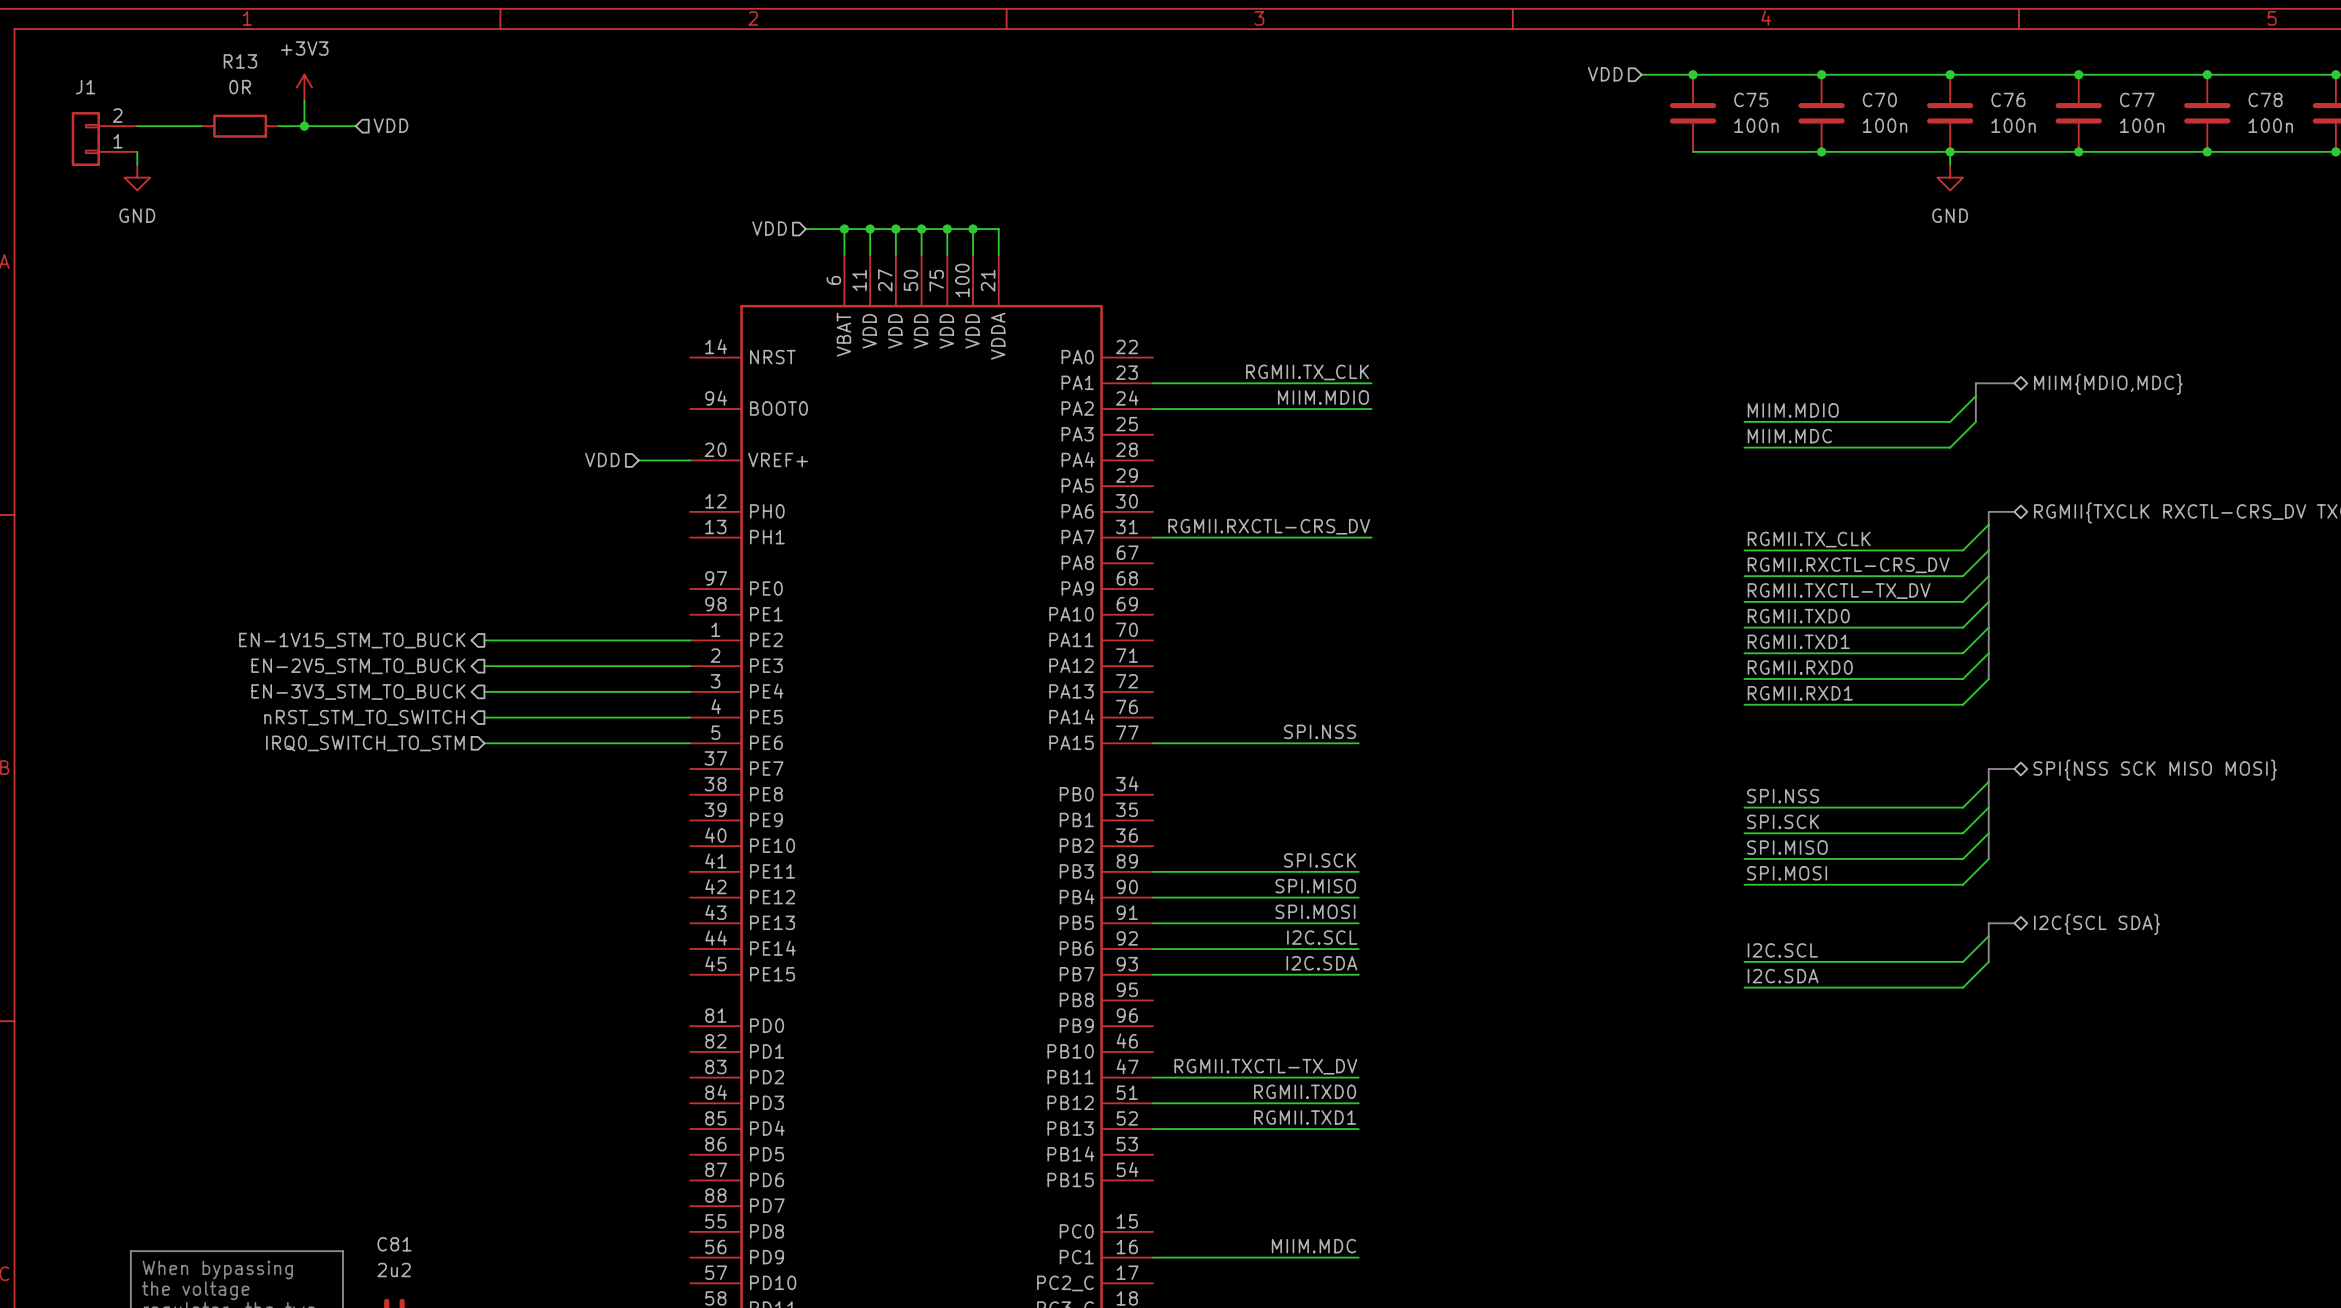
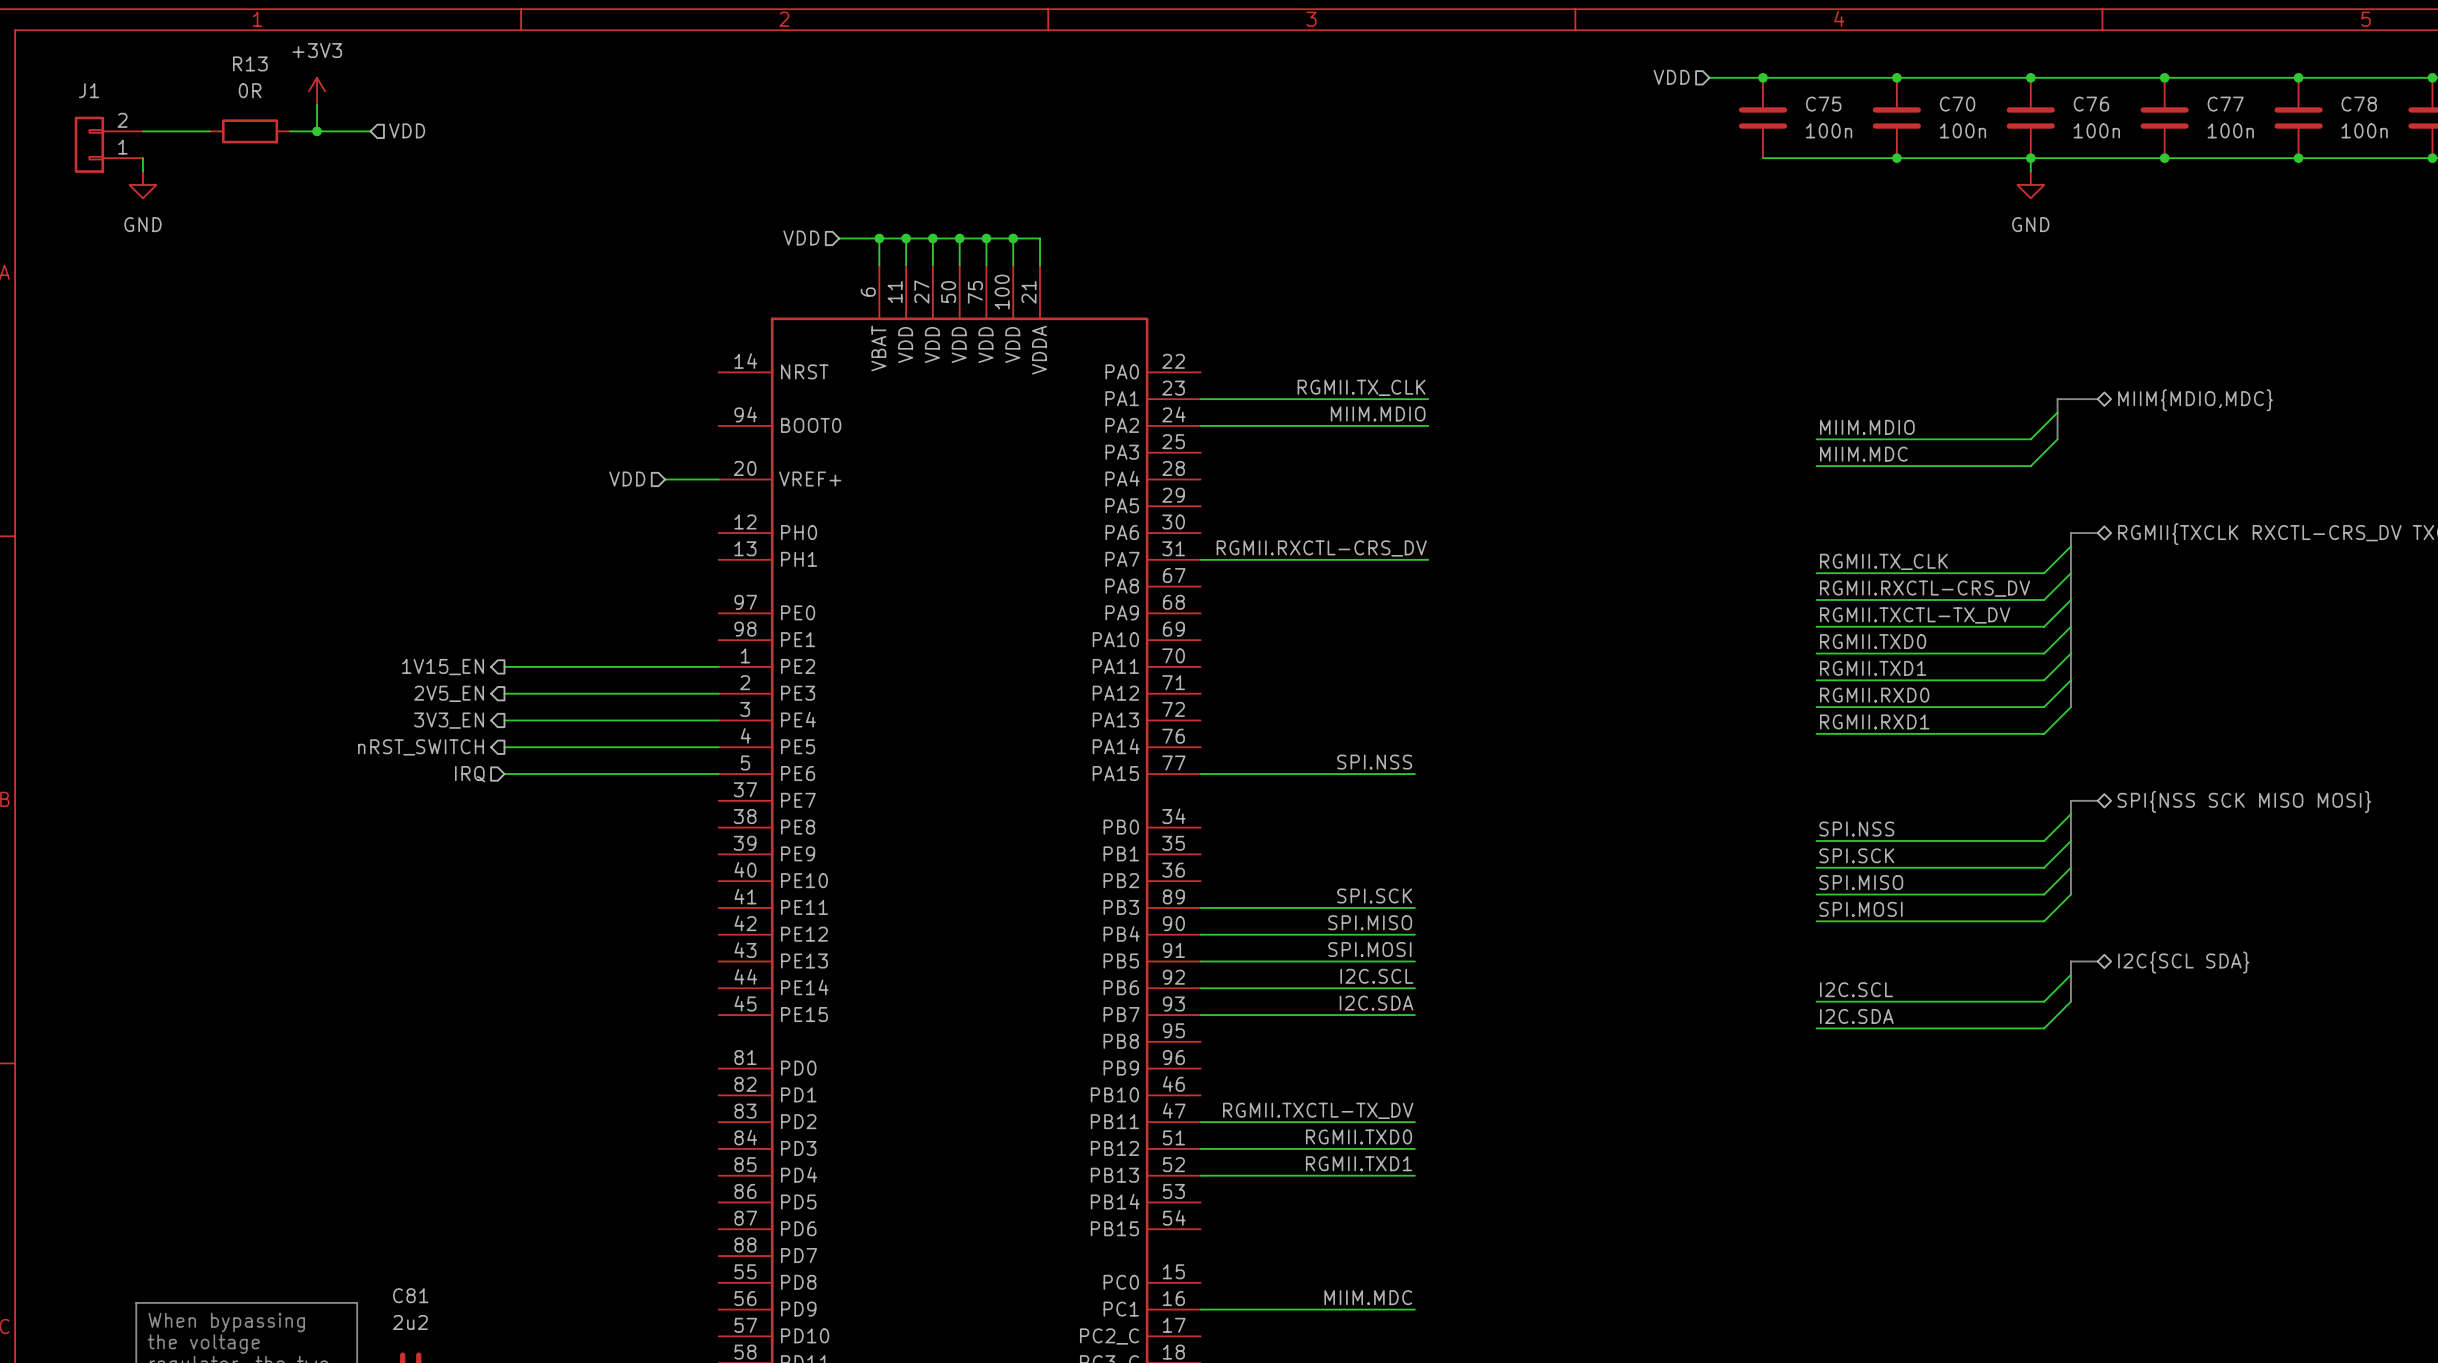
hierarchical label: EN-1V15_STM_TO_BUCK (352, 640) -> 1V15_EN (443, 667)
hierarchical label: EN-2V5_STM_TO_BUCK (358, 666) -> 2V5_EN (449, 693)
hierarchical label: EN-3V3_STM_TO_BUCK (358, 692) -> 3V3_EN (449, 720)
hierarchical label: nRST_STM_TO_SWITCH (364, 717) -> nRST_SWITCH (421, 747)
hierarchical label: IRQ0_SWITCH_TO_STM (365, 743) -> IRQ (470, 774)

